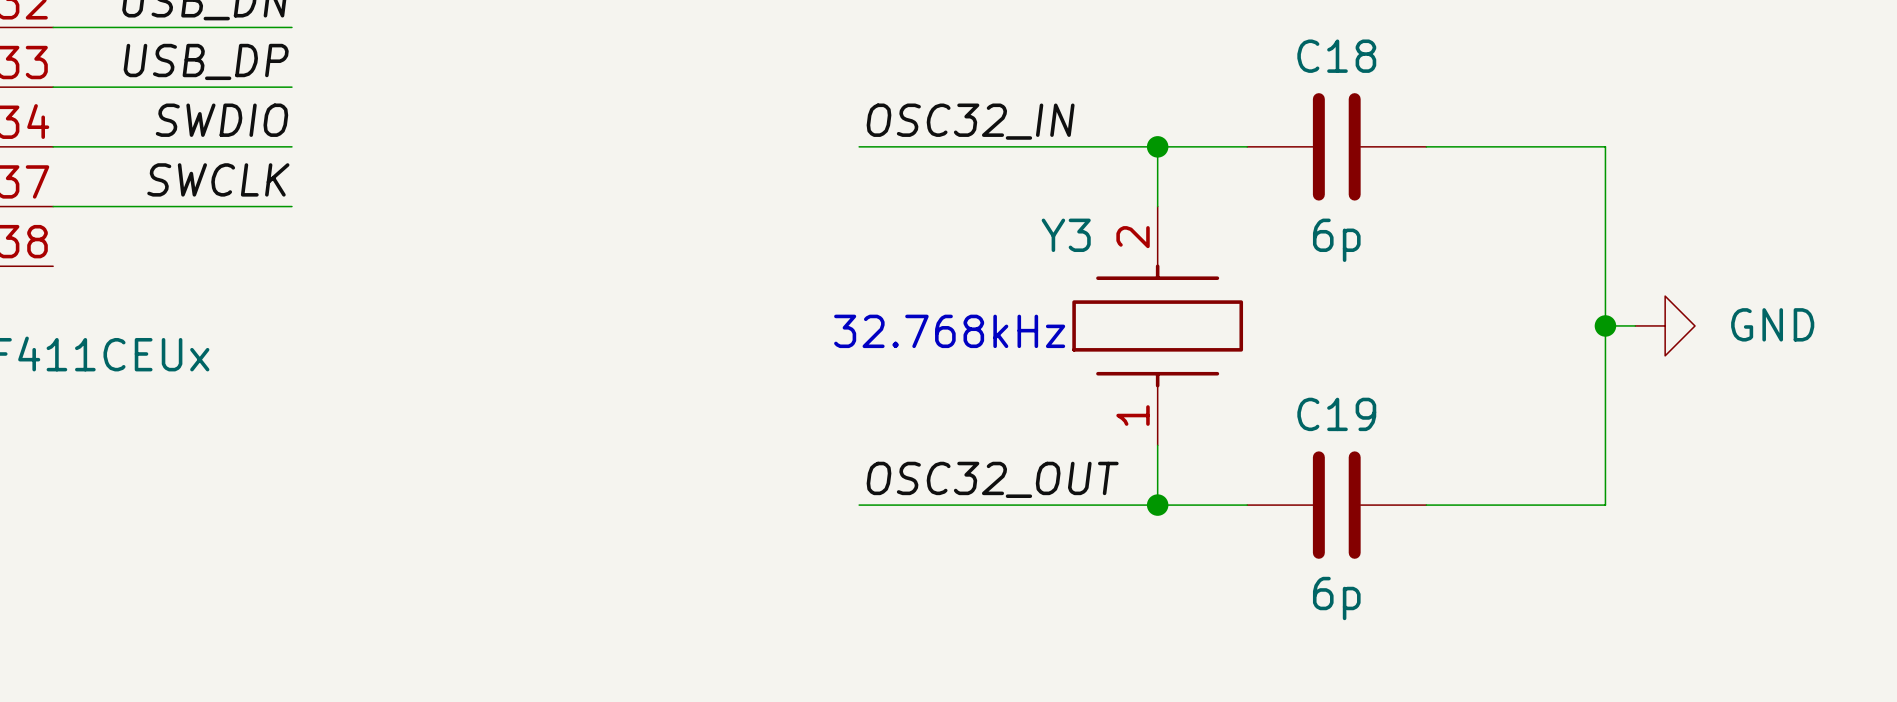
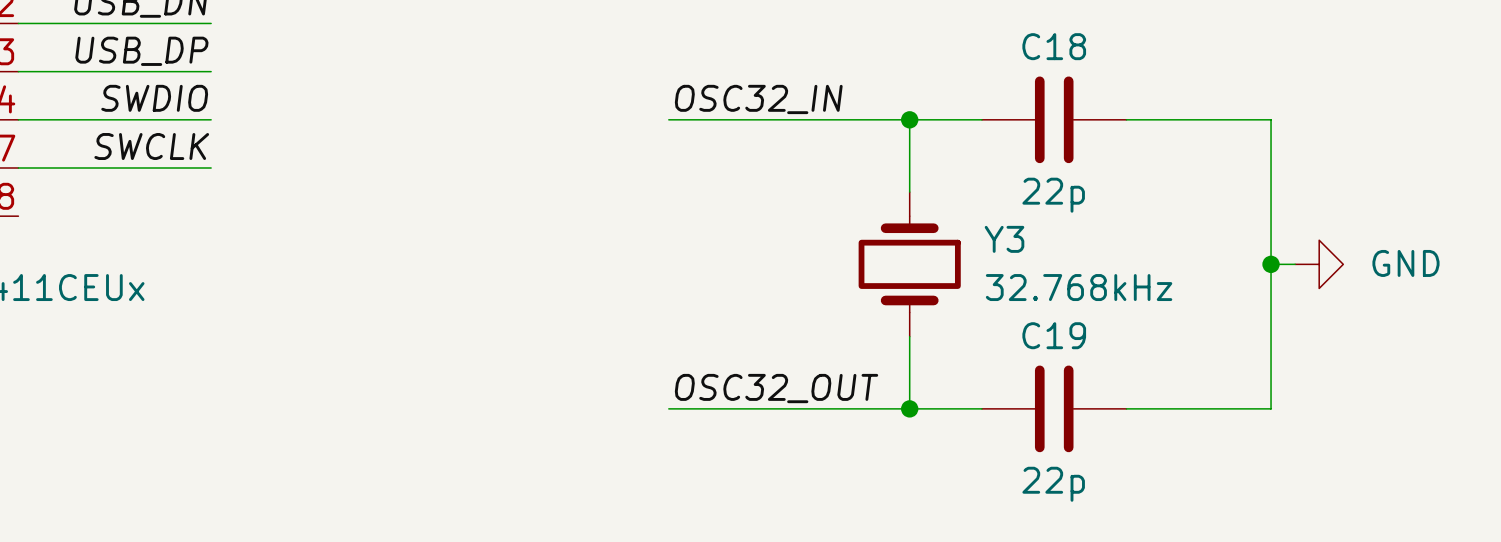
Y3 symbol: [1072, 206, 1244, 446] -> [858, 192, 961, 337]
Y3 name position: Y3 (1066, 235) -> Y3 (1004, 239)
C18 value: 6p (1336, 240) -> 22p (1053, 195)
text: 32.768kHz (949, 331) -> none
Y3 value: none -> 32.768kHz (1079, 287)
C19 value: 6p (1336, 598) -> 22p (1053, 484)

